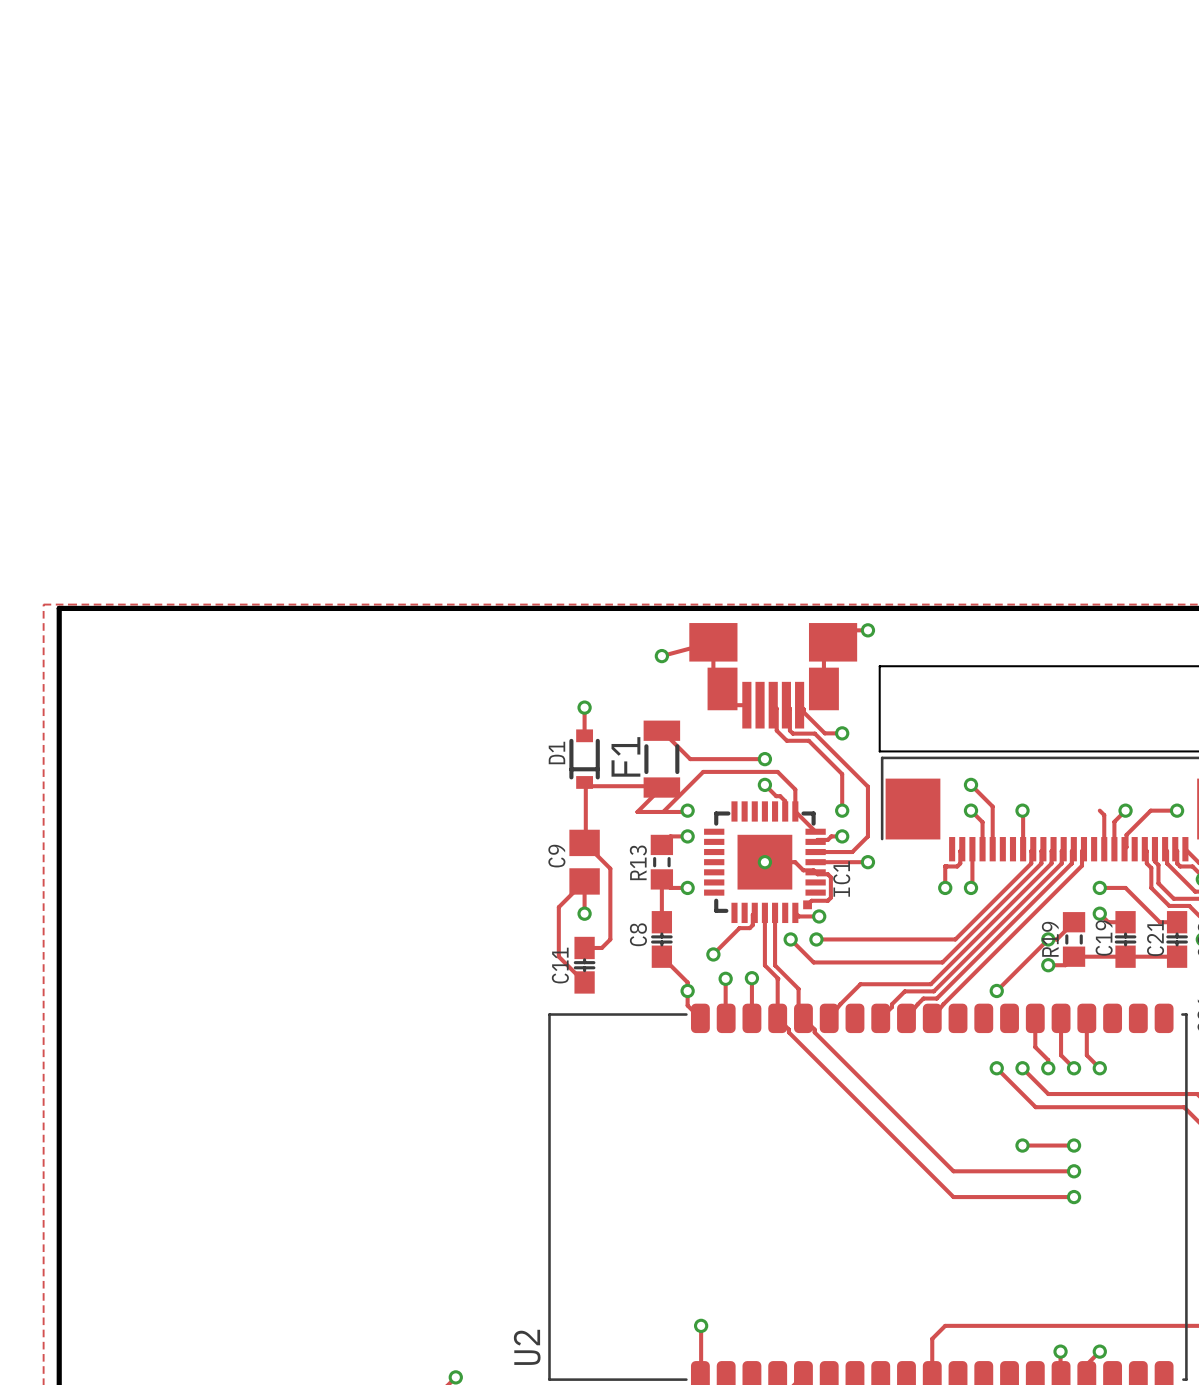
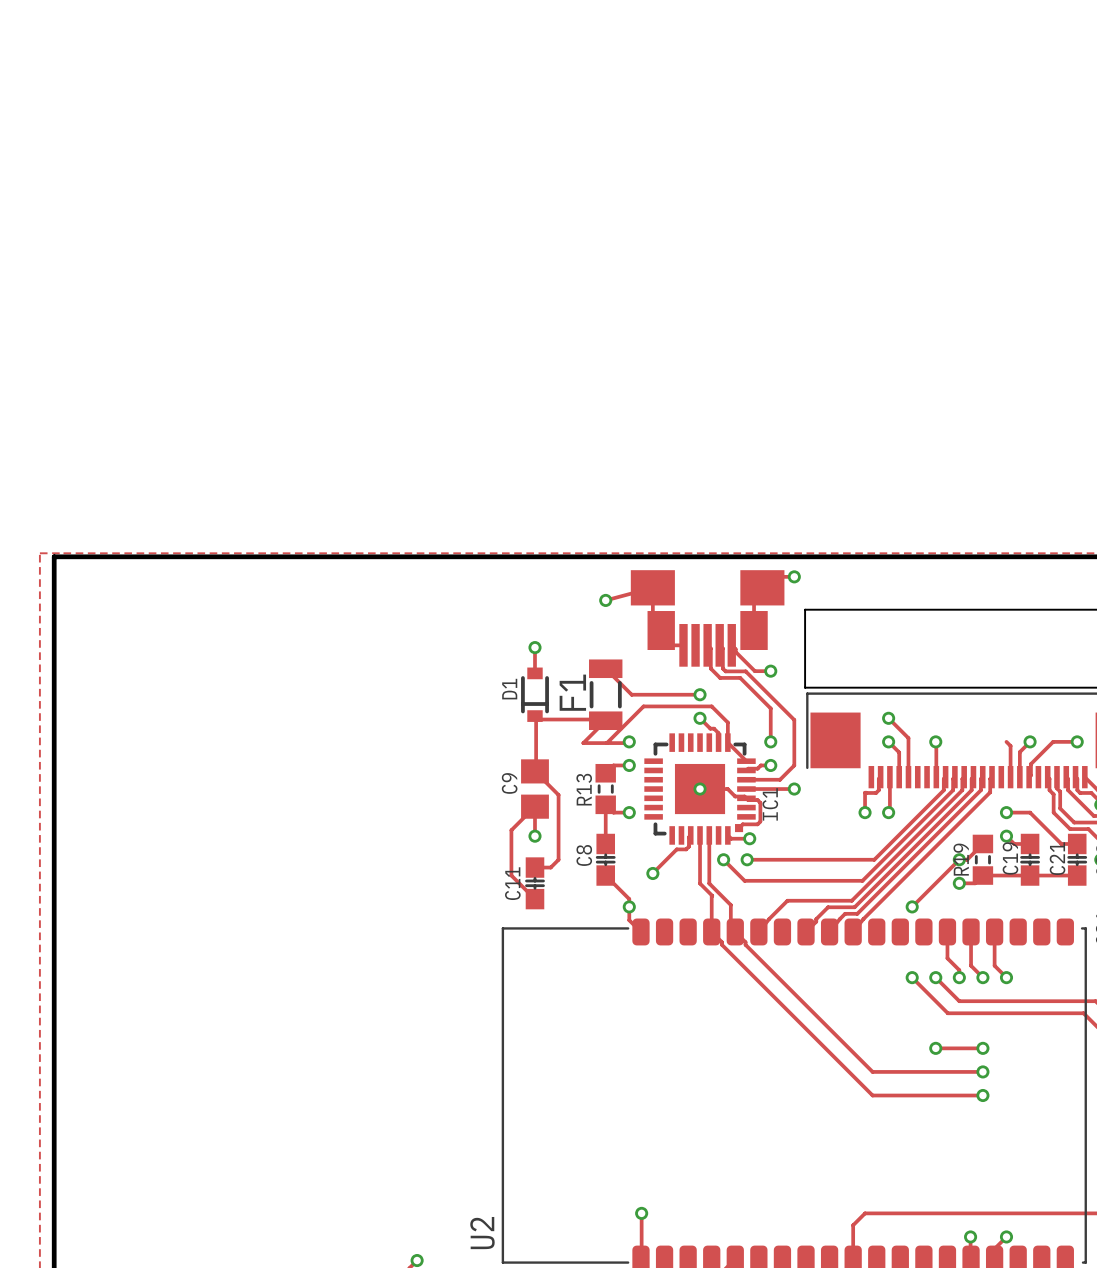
track: (725, 978) (726, 1018) -> none
via: (725, 978) -> none
track: (751, 978) (751, 1018) -> none
via: (751, 978) -> none

